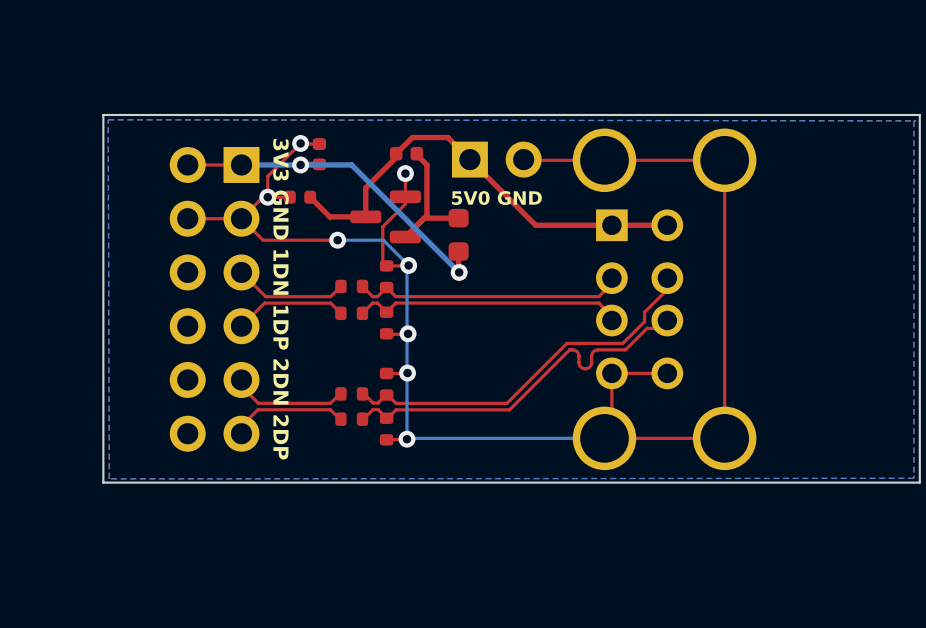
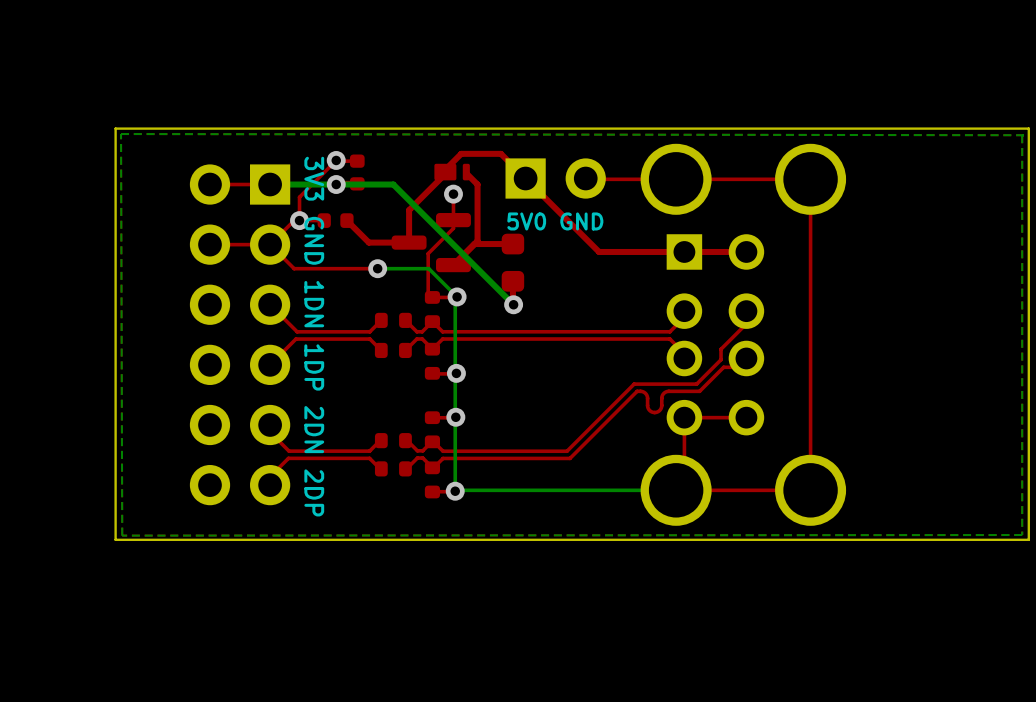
part footprint: [390, 146, 424, 161] -> [434, 163, 470, 181]

